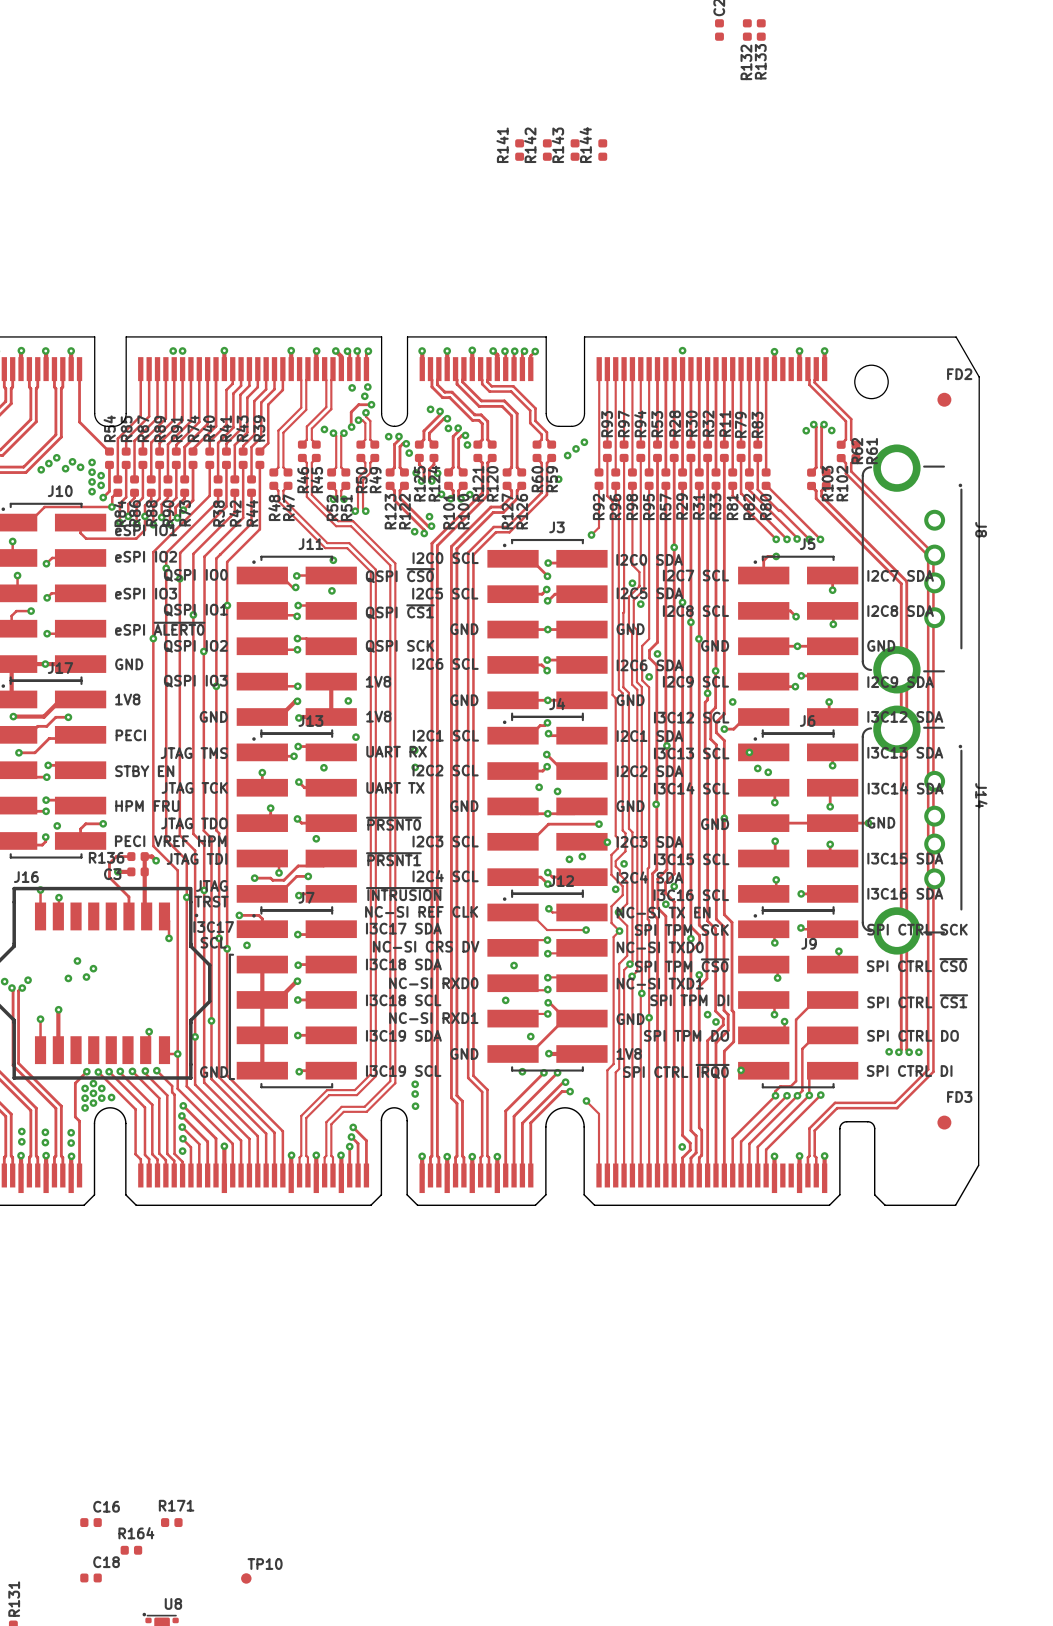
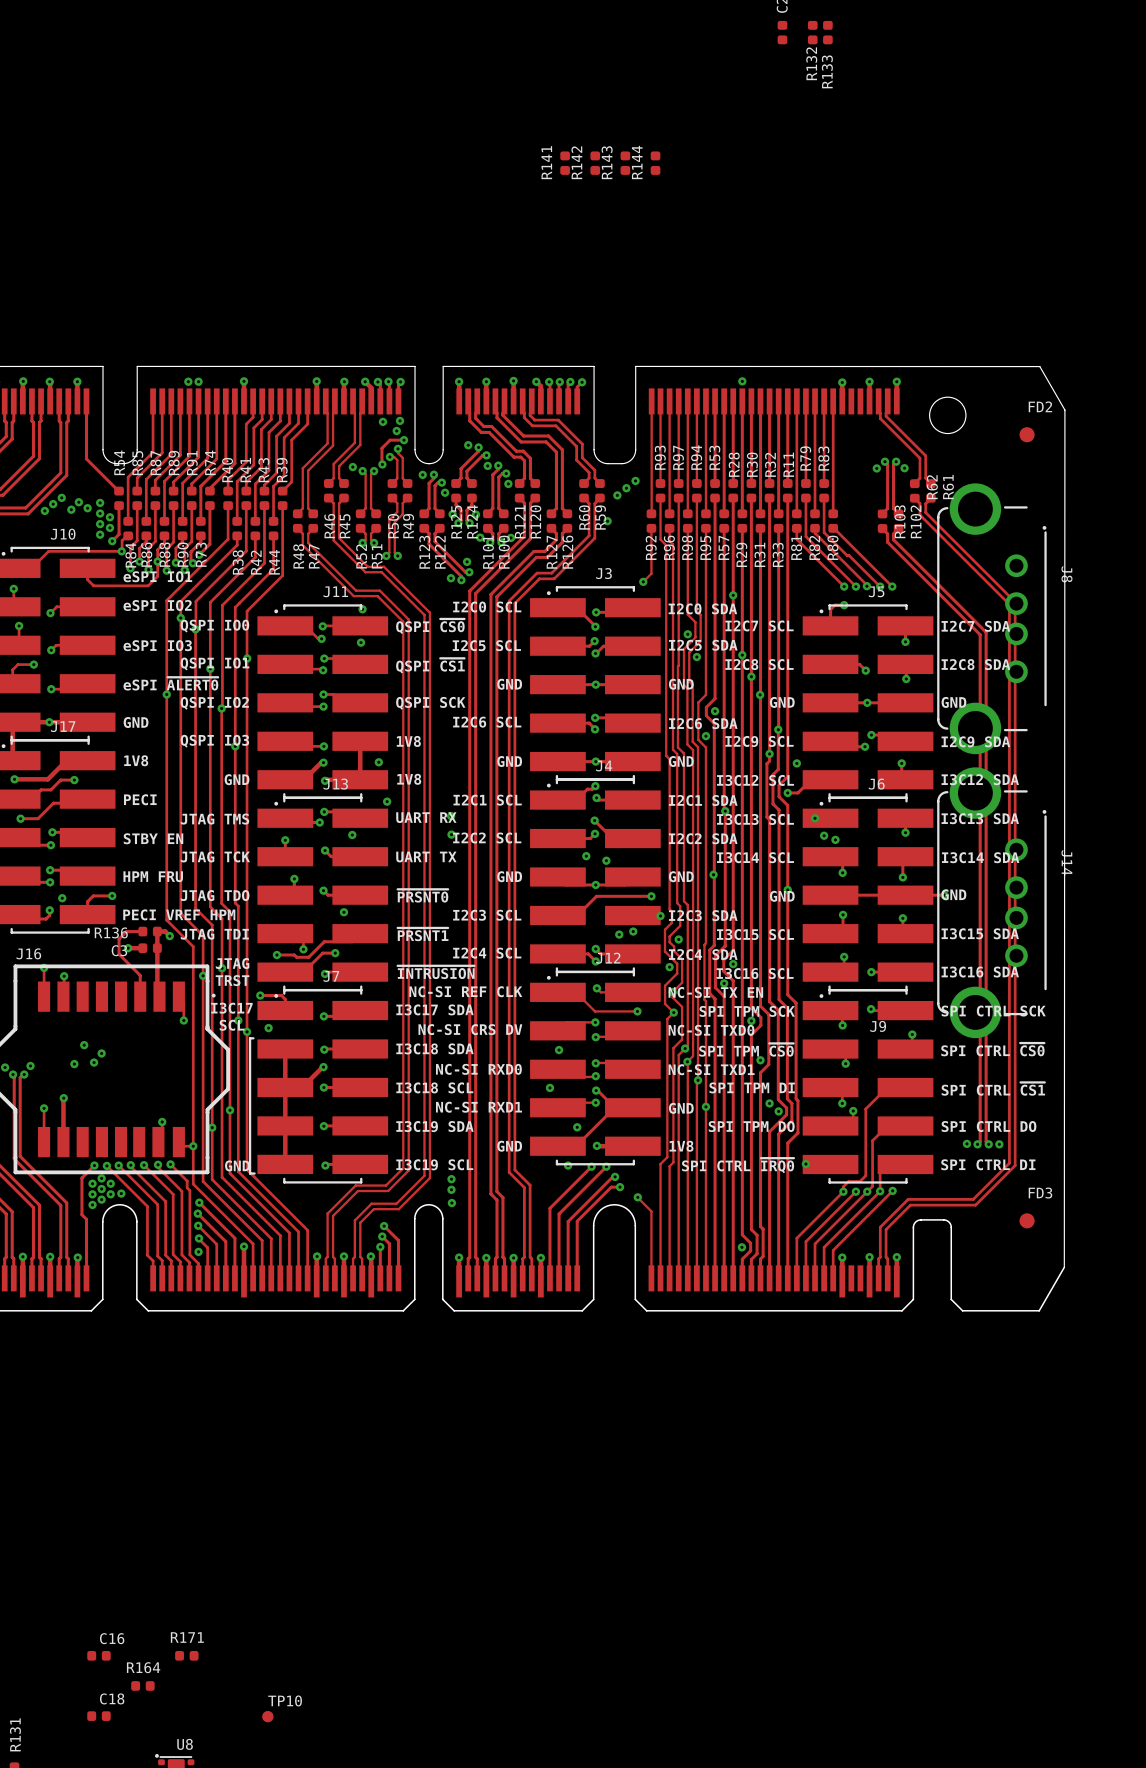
via: (21, 1131) -> none
via: (45, 1132) -> none
via: (71, 1132) -> none
via: (21, 1141) -> none
via: (45, 1142) -> none
via: (71, 1143) -> none

